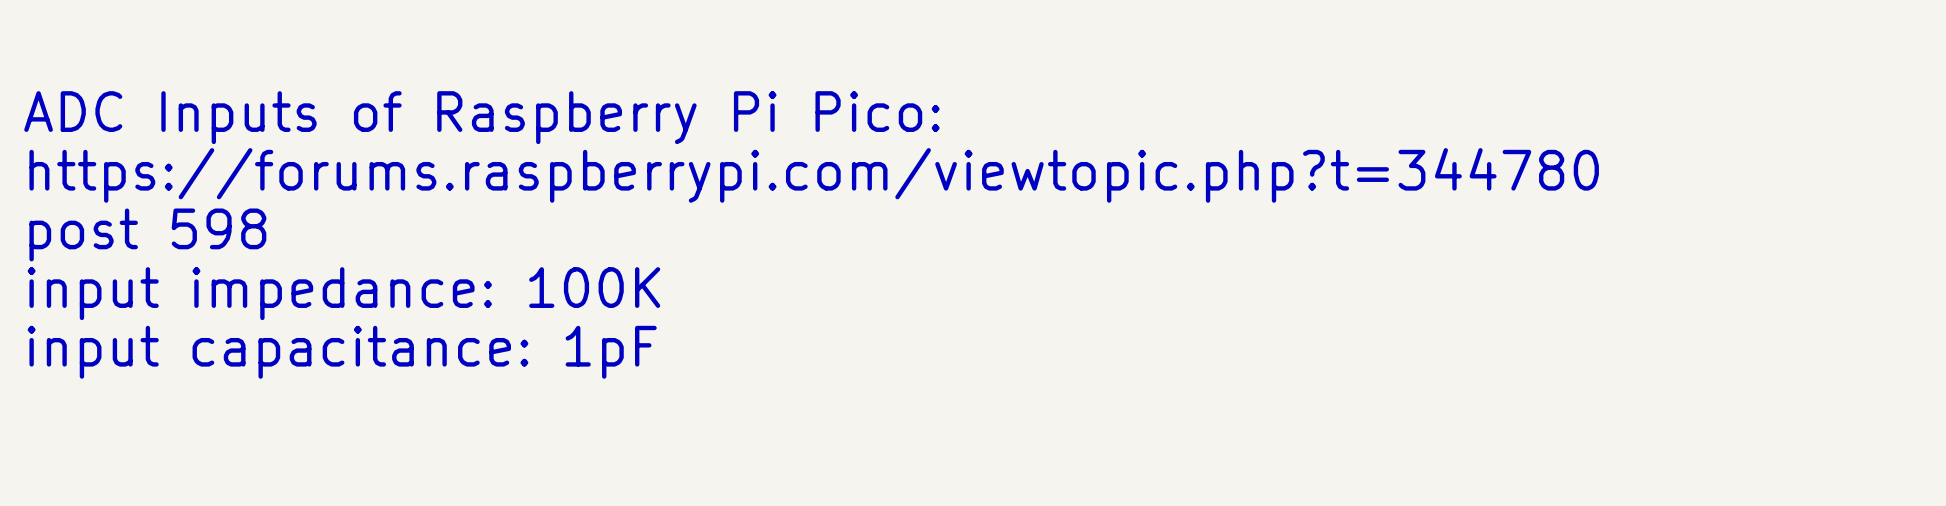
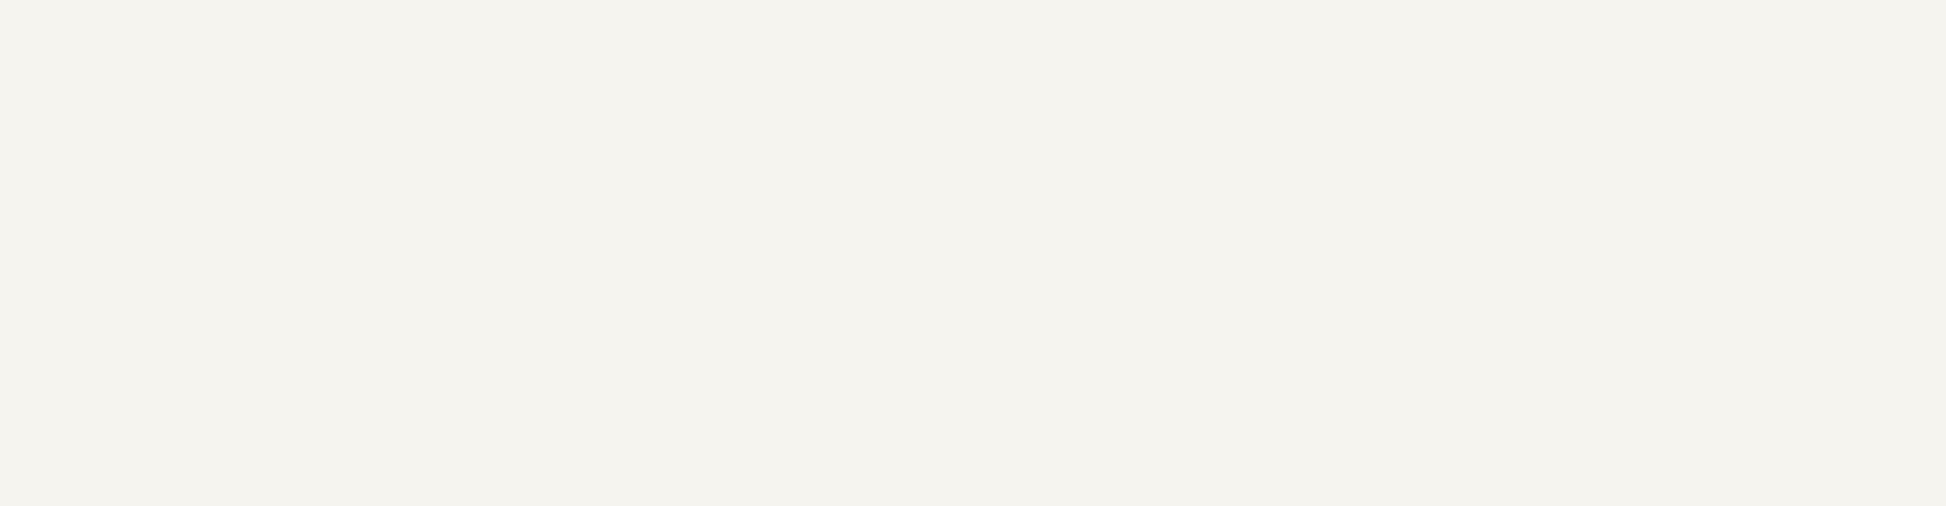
text: ADC Inputs of Raspberry Pi Pico: (481, 117) -> none
text: https://forums.raspberrypi.com/viewtopic.php?t=344780 (814, 175) -> none
text: post 598 (147, 234) -> none
text: input impedance: 100K (343, 293) -> none
text: input capacitance: 1pF (342, 352) -> none

